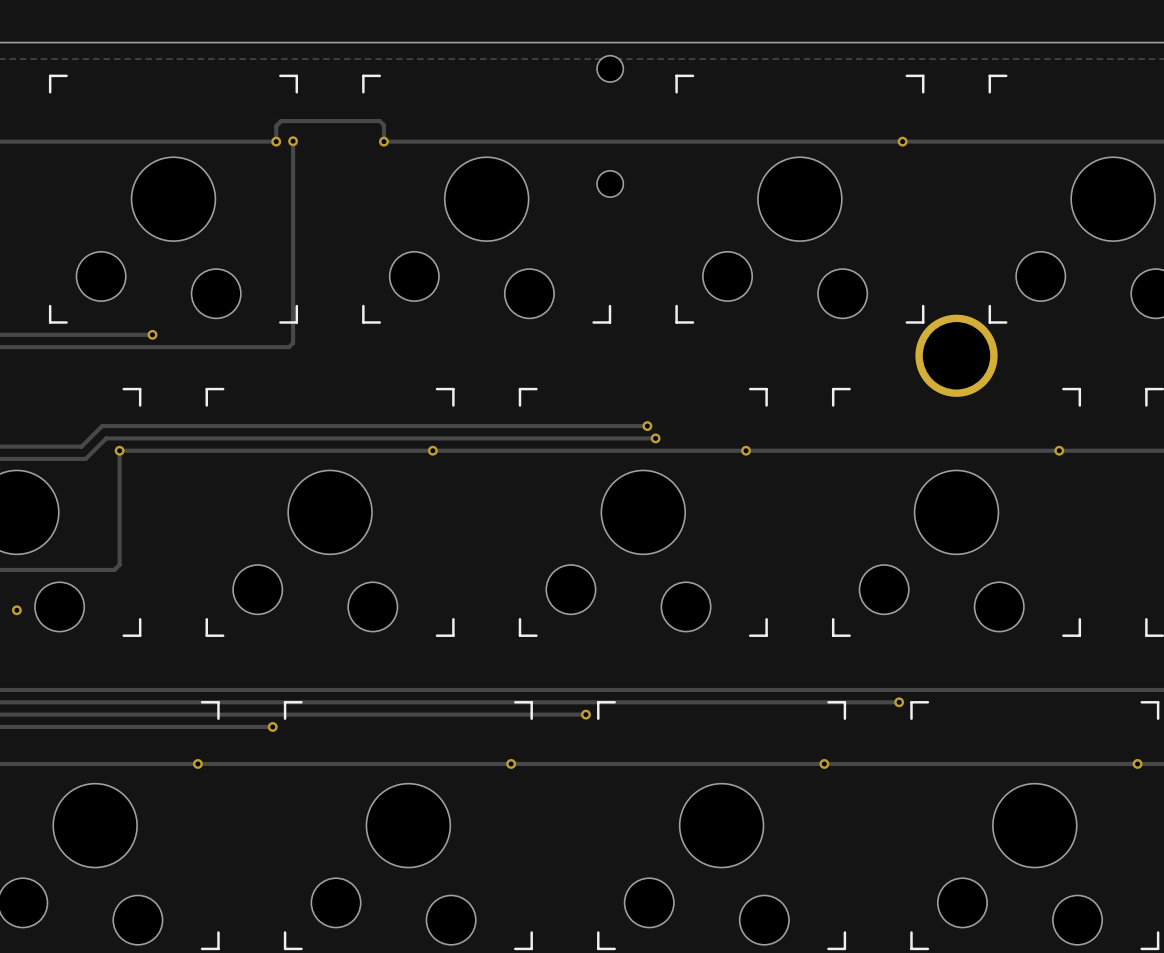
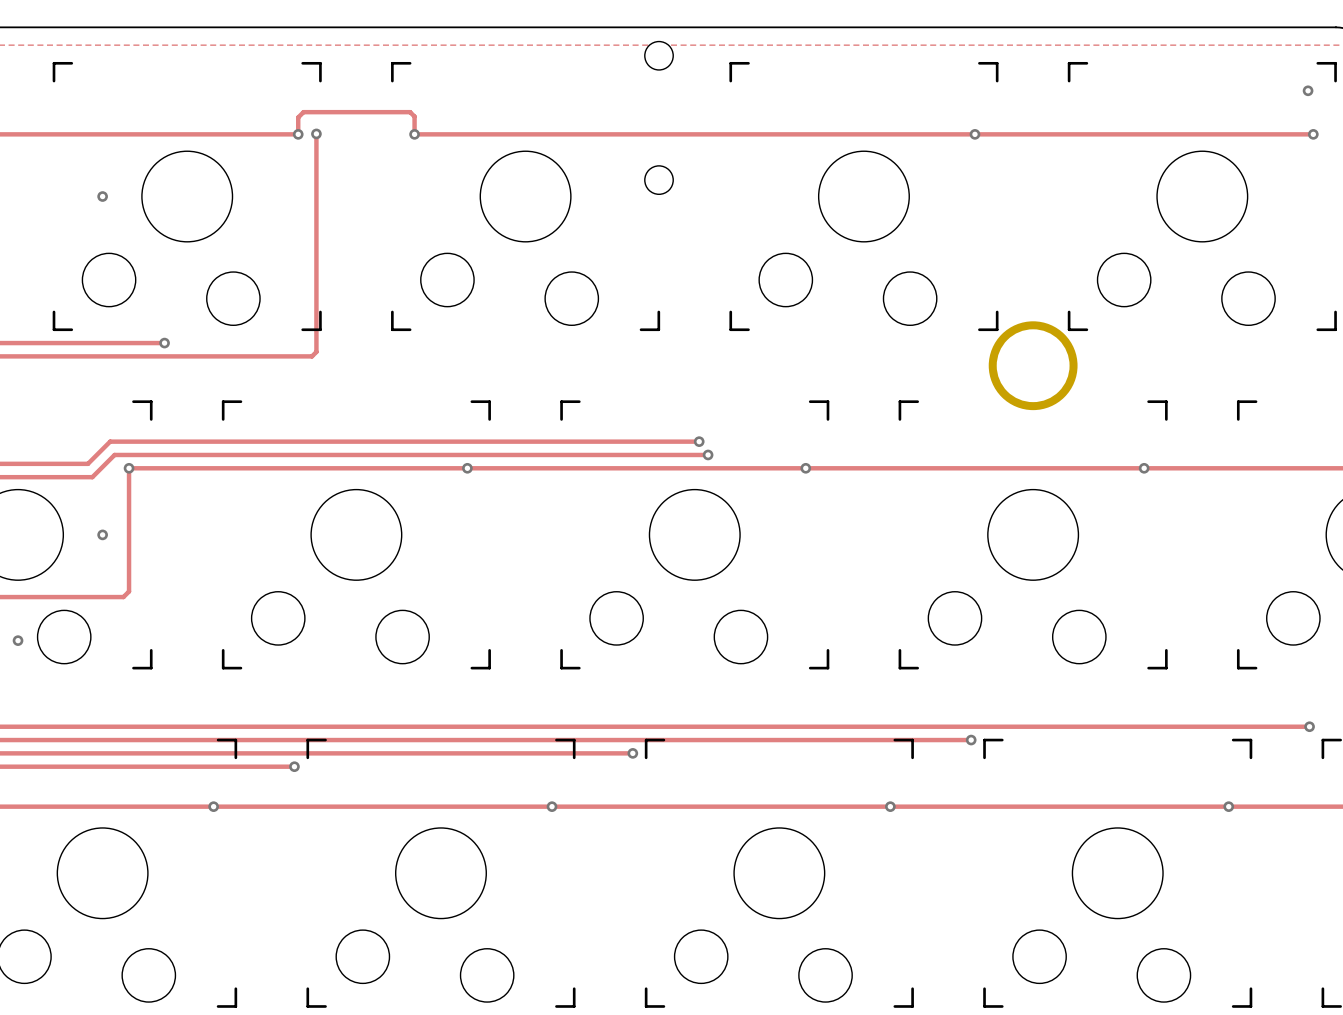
via: none -> (102, 196)
via: none -> (102, 534)

